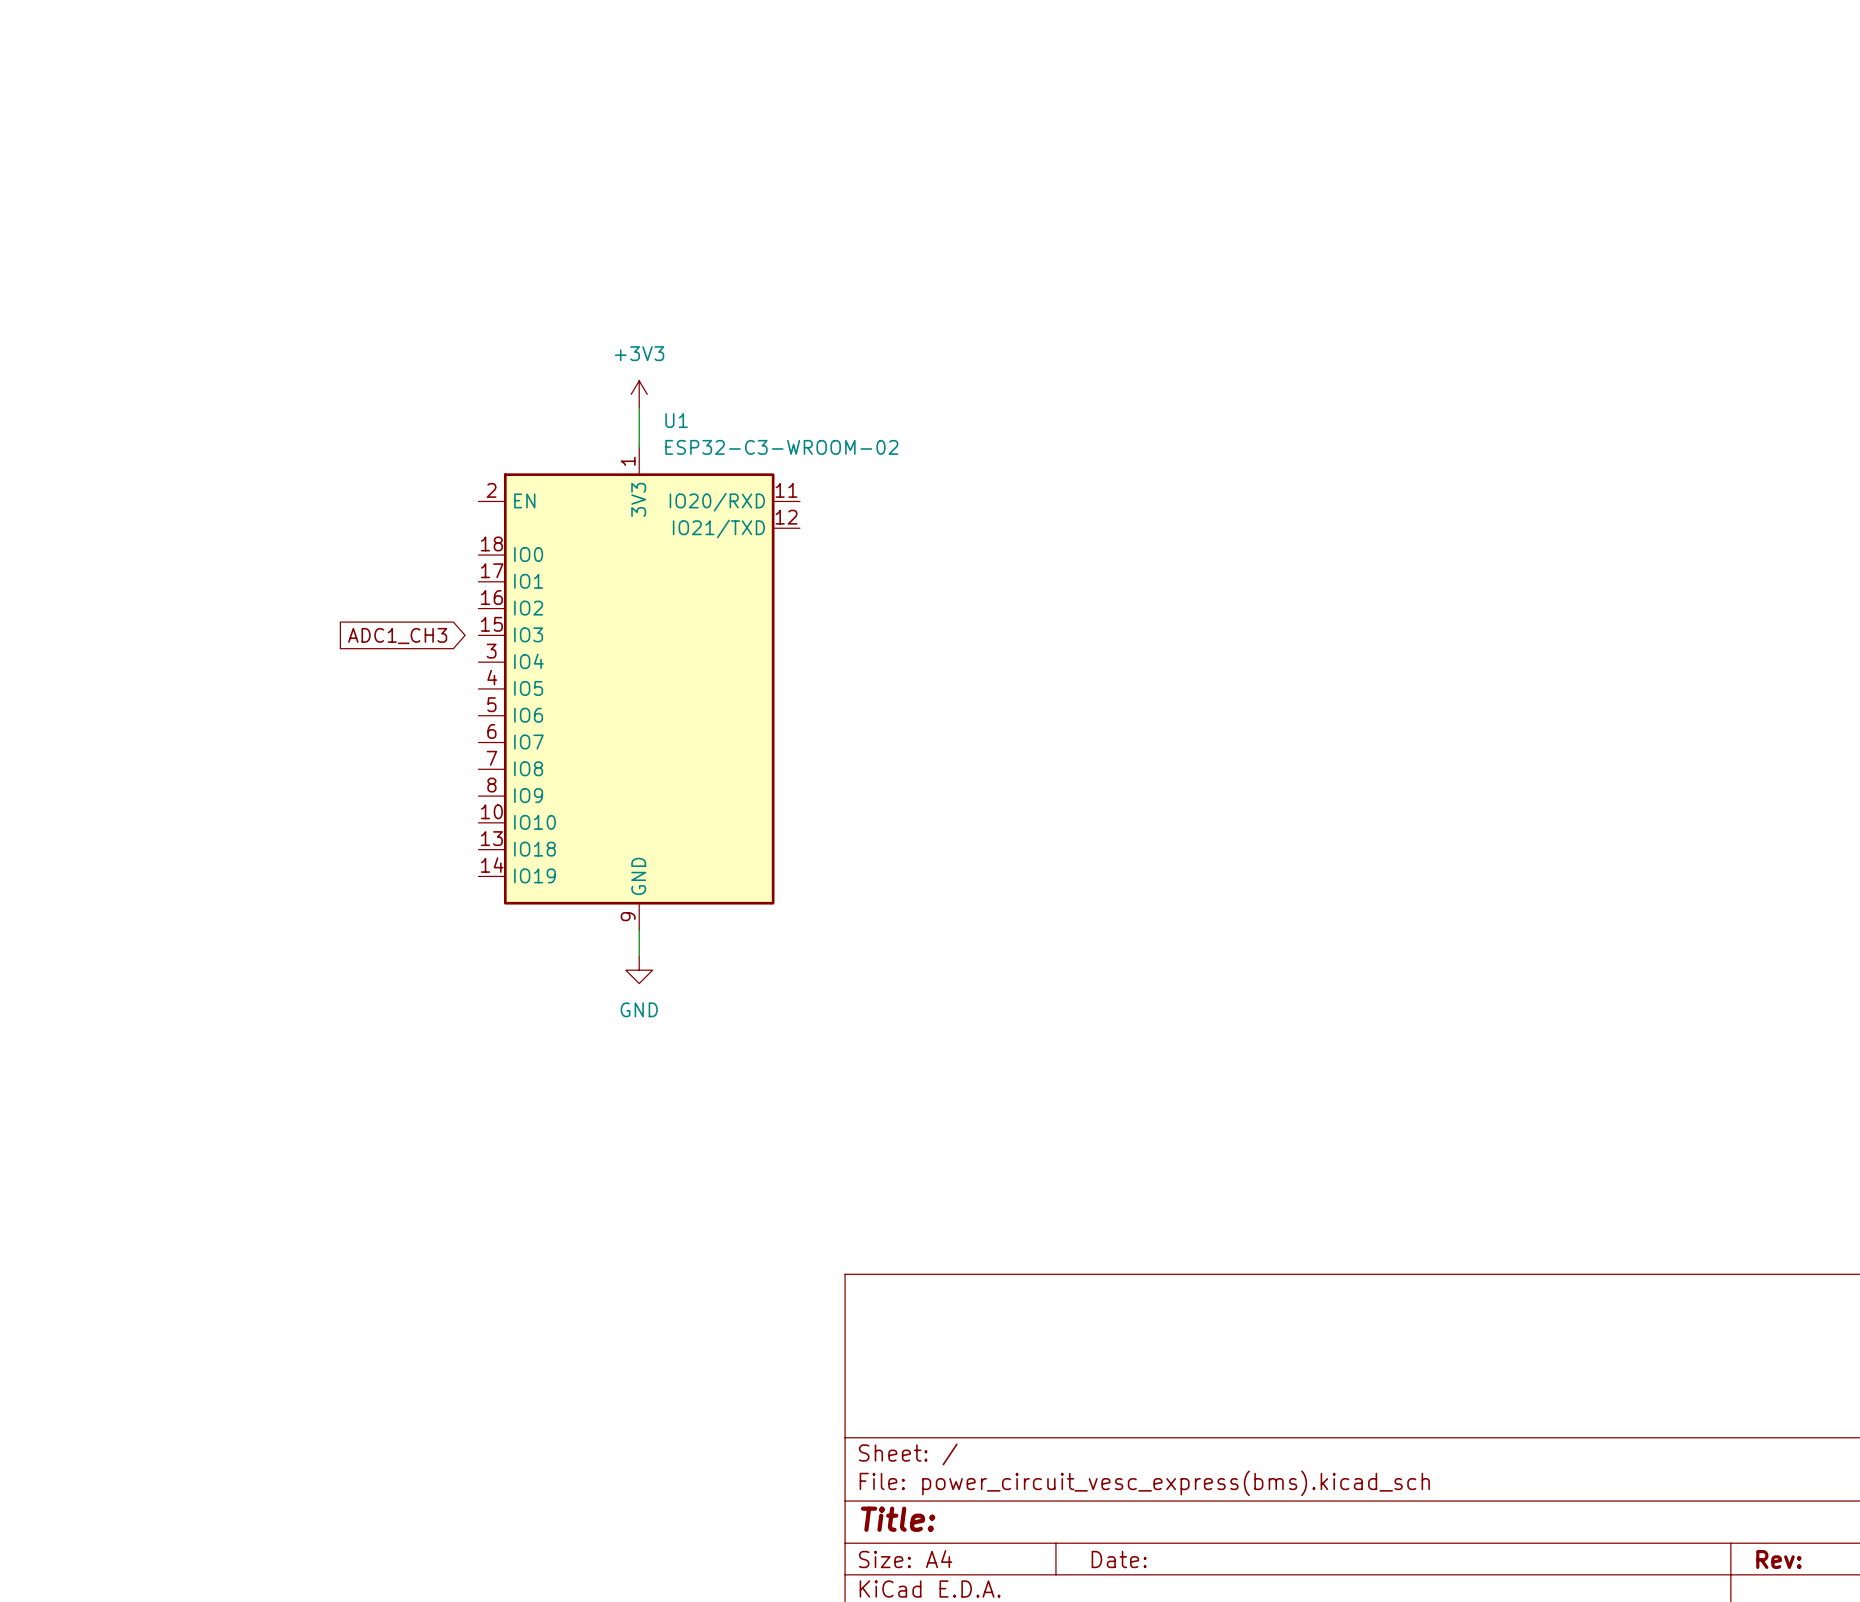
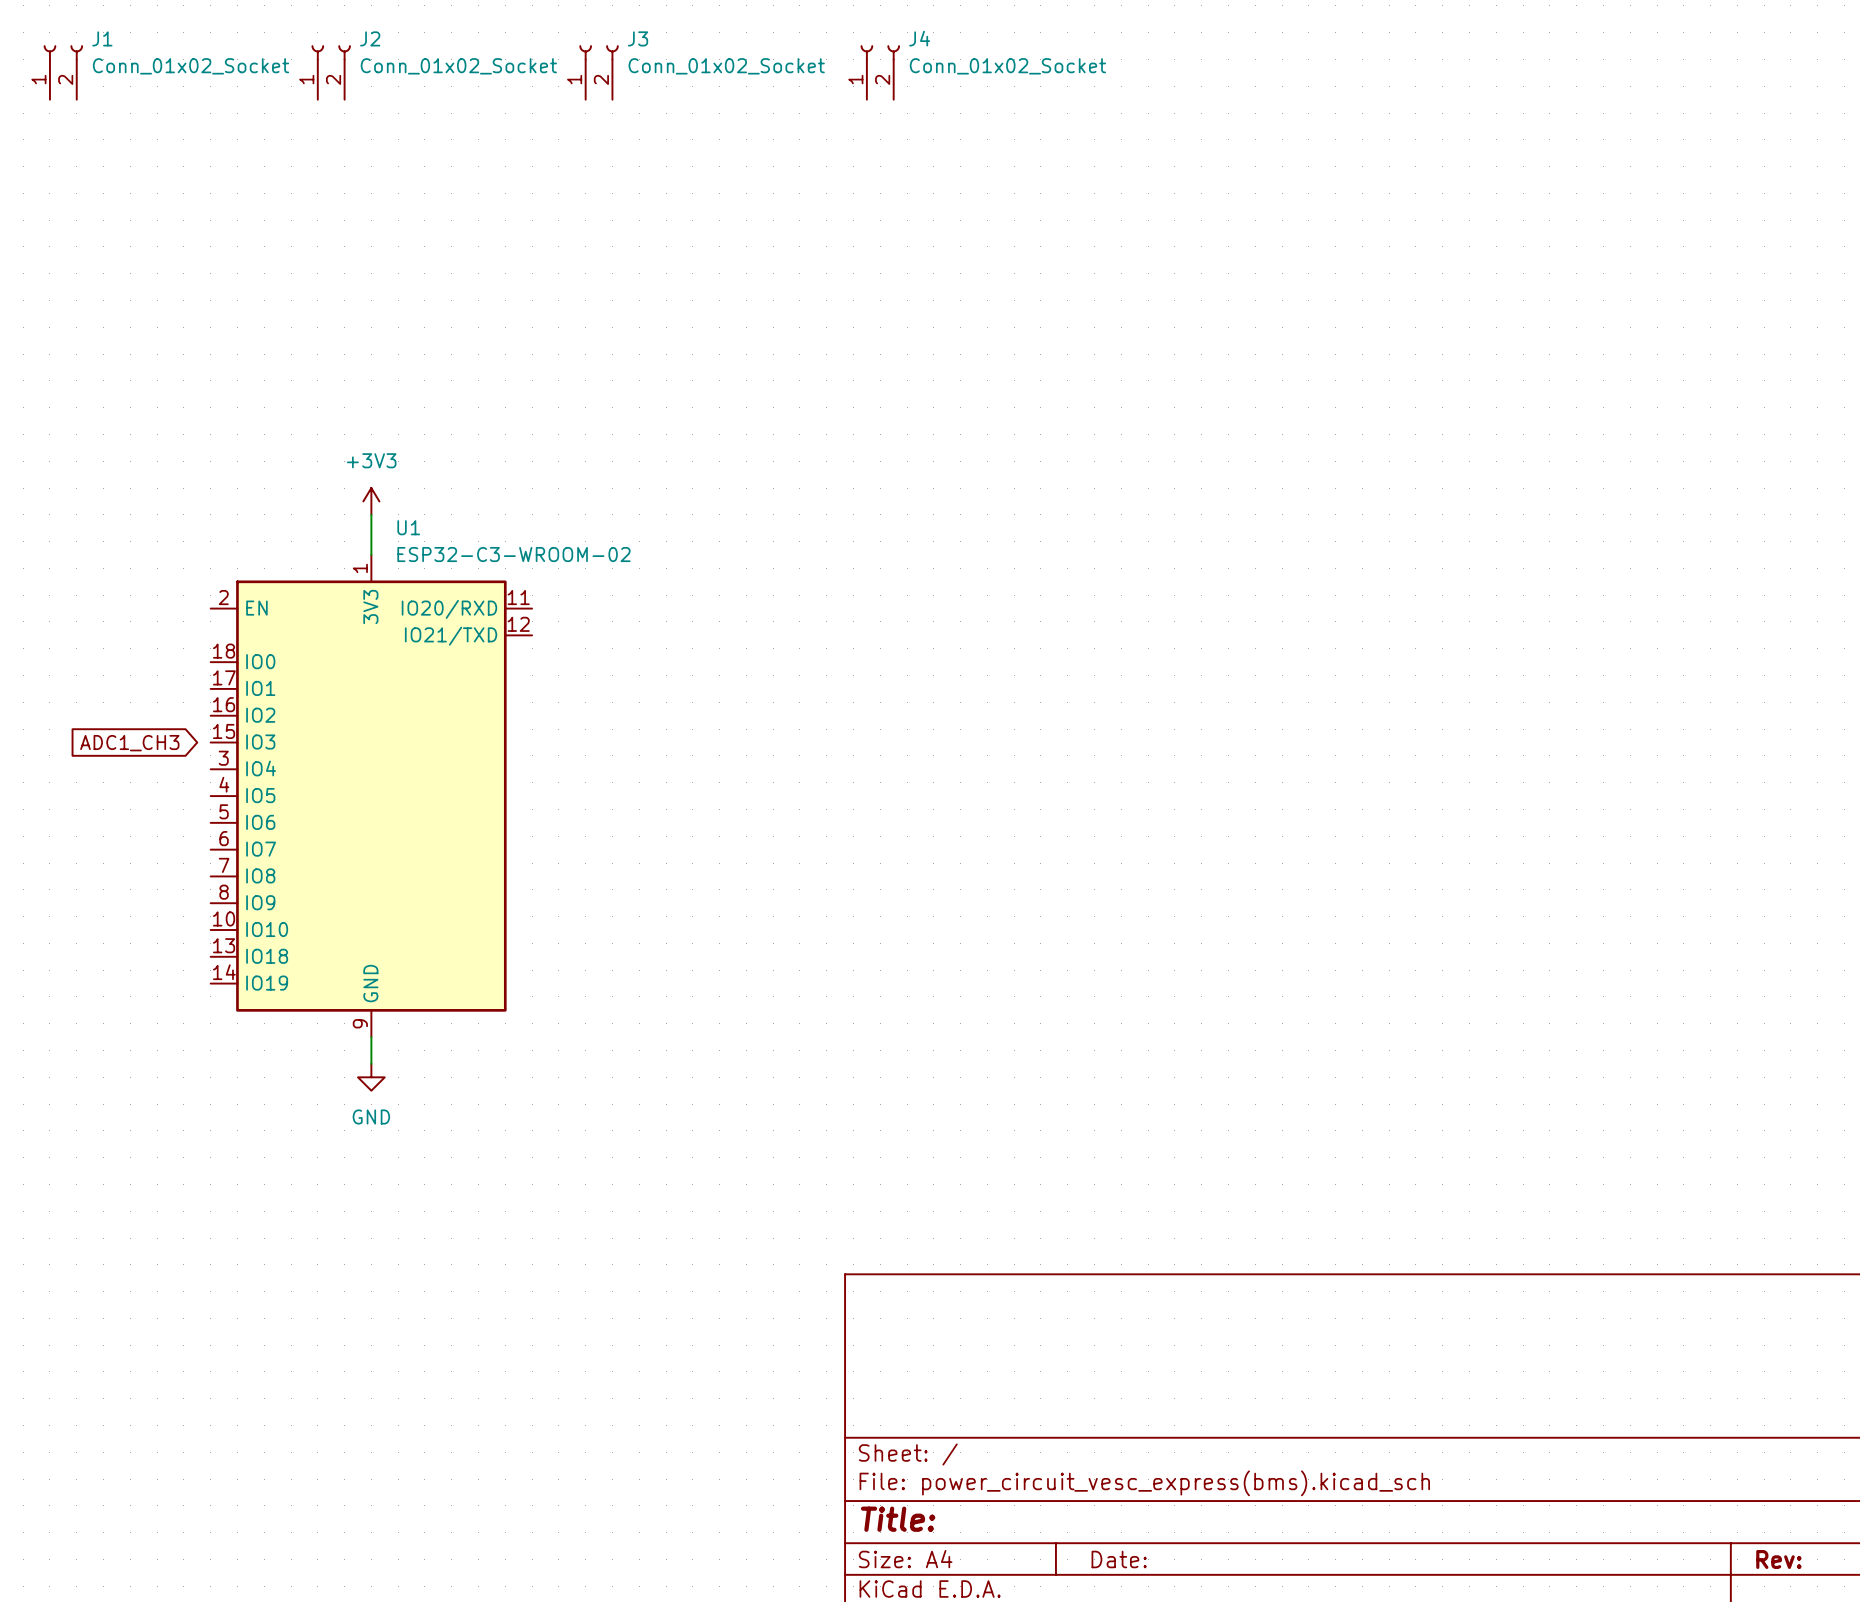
J1: none -> Conn_01x02_Socket (63, 72)
J2: none -> Conn_01x02_Socket (331, 72)
J3: none -> Conn_01x02_Socket (599, 72)
J4: none -> Conn_01x02_Socket (880, 72)
power symbol: +3V3 (639, 394) -> none
wire: (639, 407) (639, 447) -> none
power symbol: none -> +3V3 (371, 501)
wire: none -> (371, 514) (371, 555)
global label: ADC1_CH3 (397, 636) -> none
U1 position: (639, 688) -> (371, 796)
global label: none -> ADC1_CH3 (129, 743)
wire: (639, 930) (639, 956) -> none
power symbol: GND (639, 970) -> none
wire: none -> (371, 1037) (371, 1063)
power symbol: none -> GND (371, 1077)

